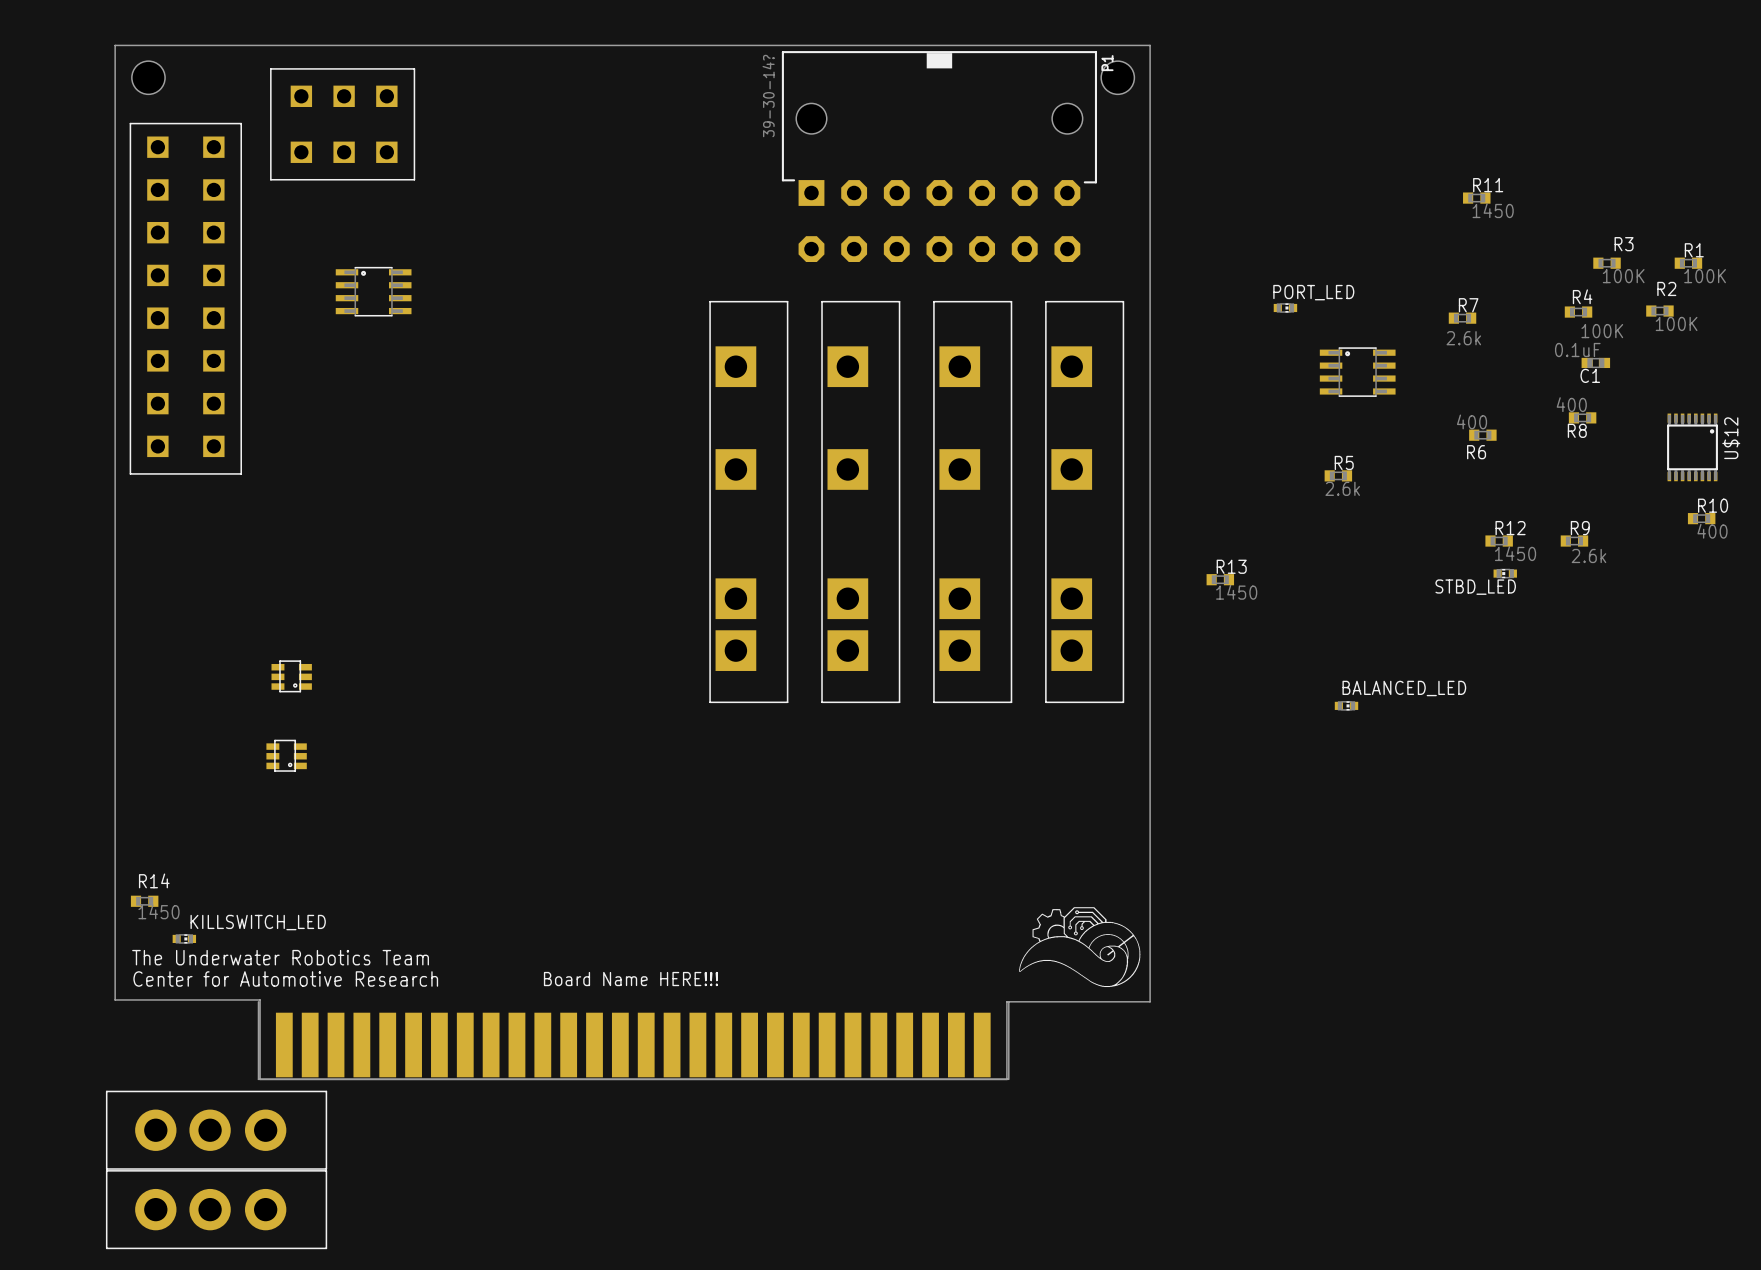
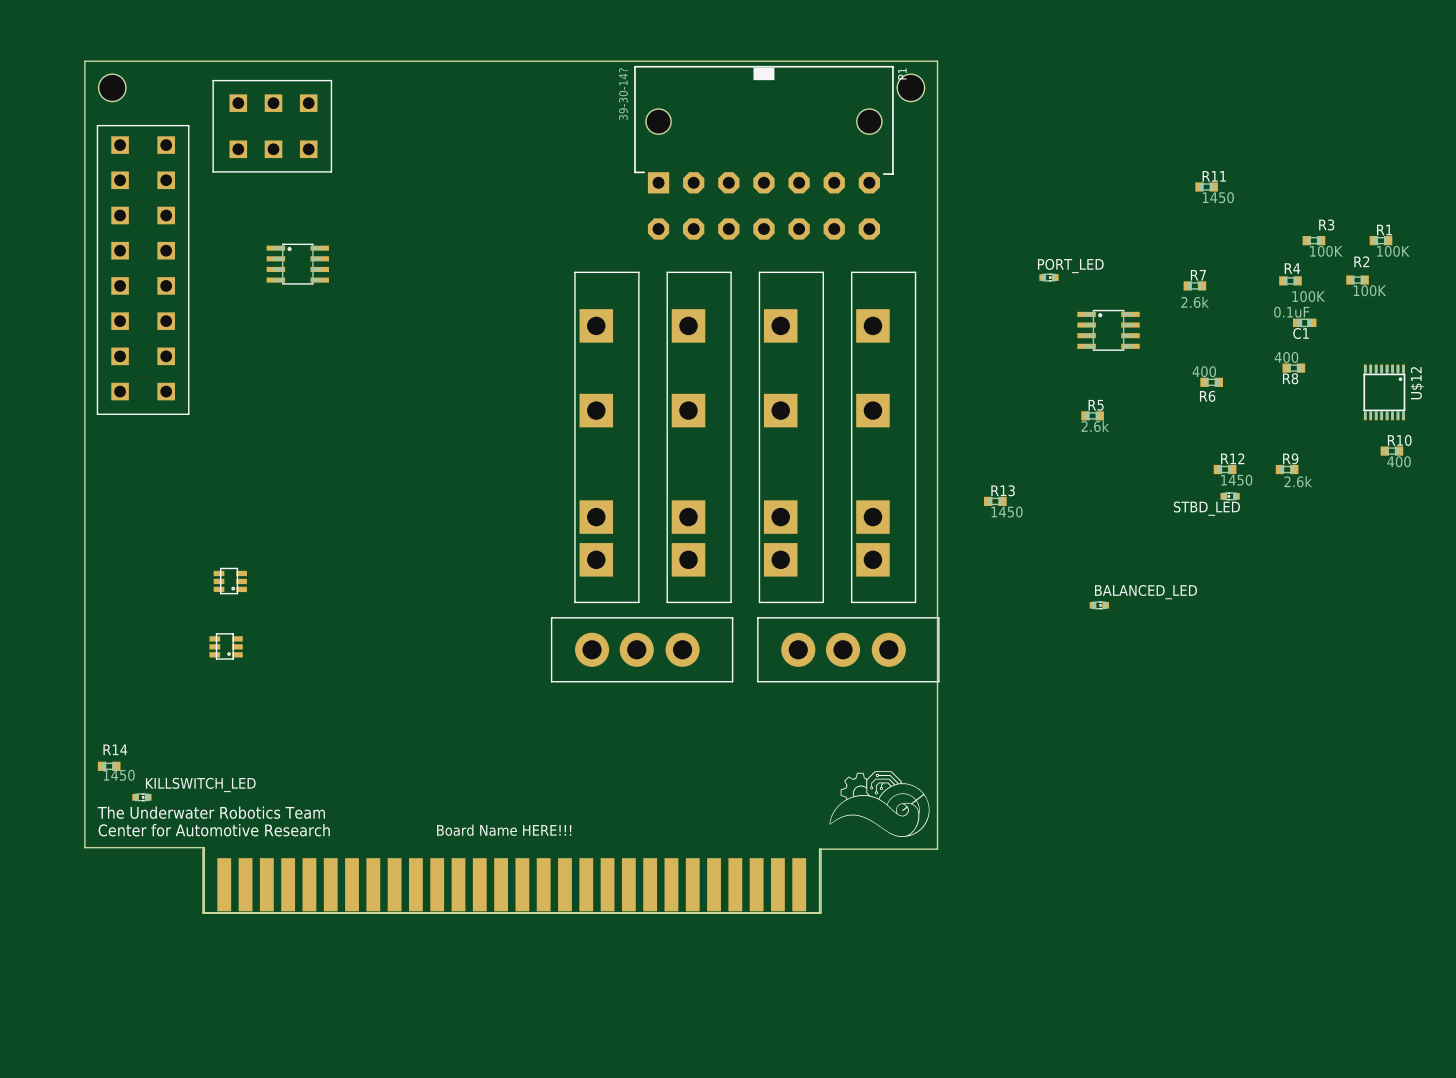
part: none -> (642, 649)
part: none -> (848, 649)
part: (216, 1130) -> none
part: (216, 1209) -> none

